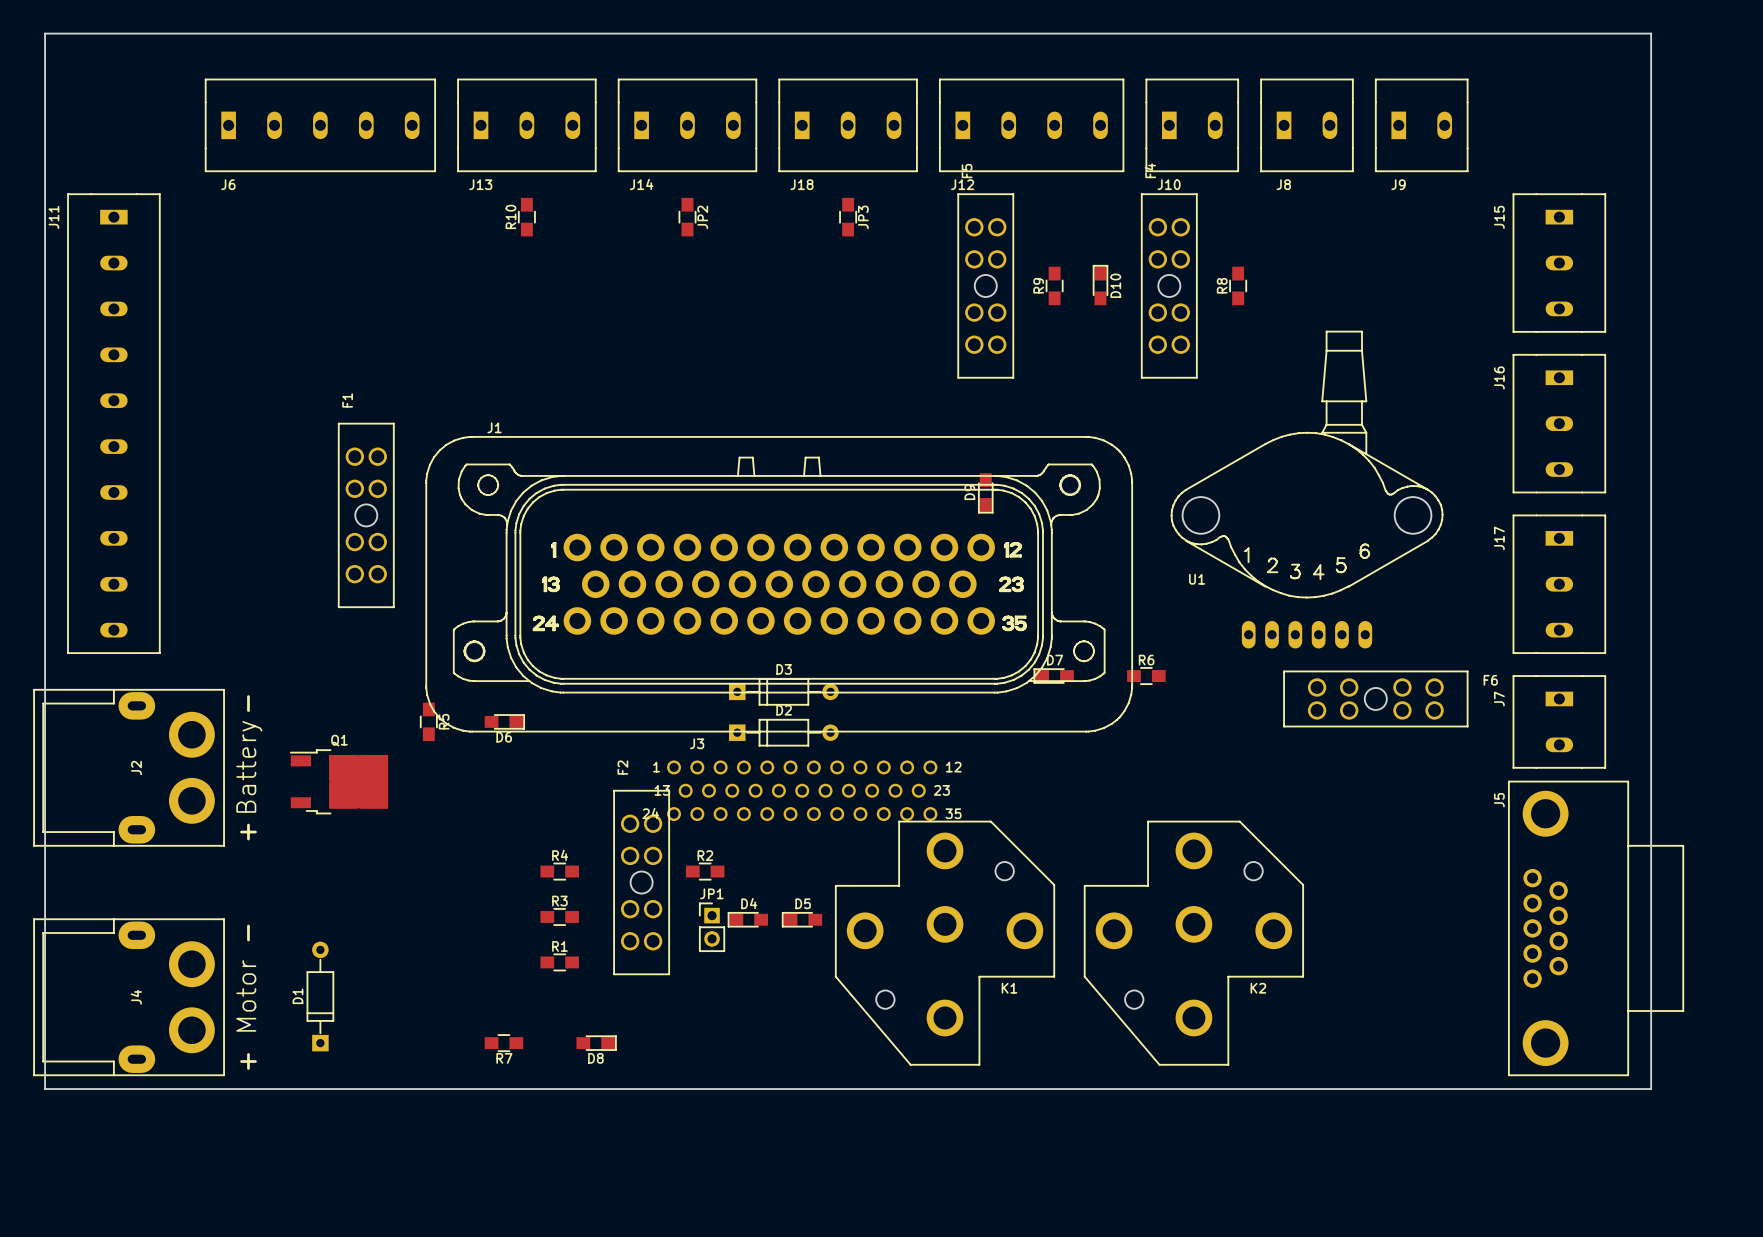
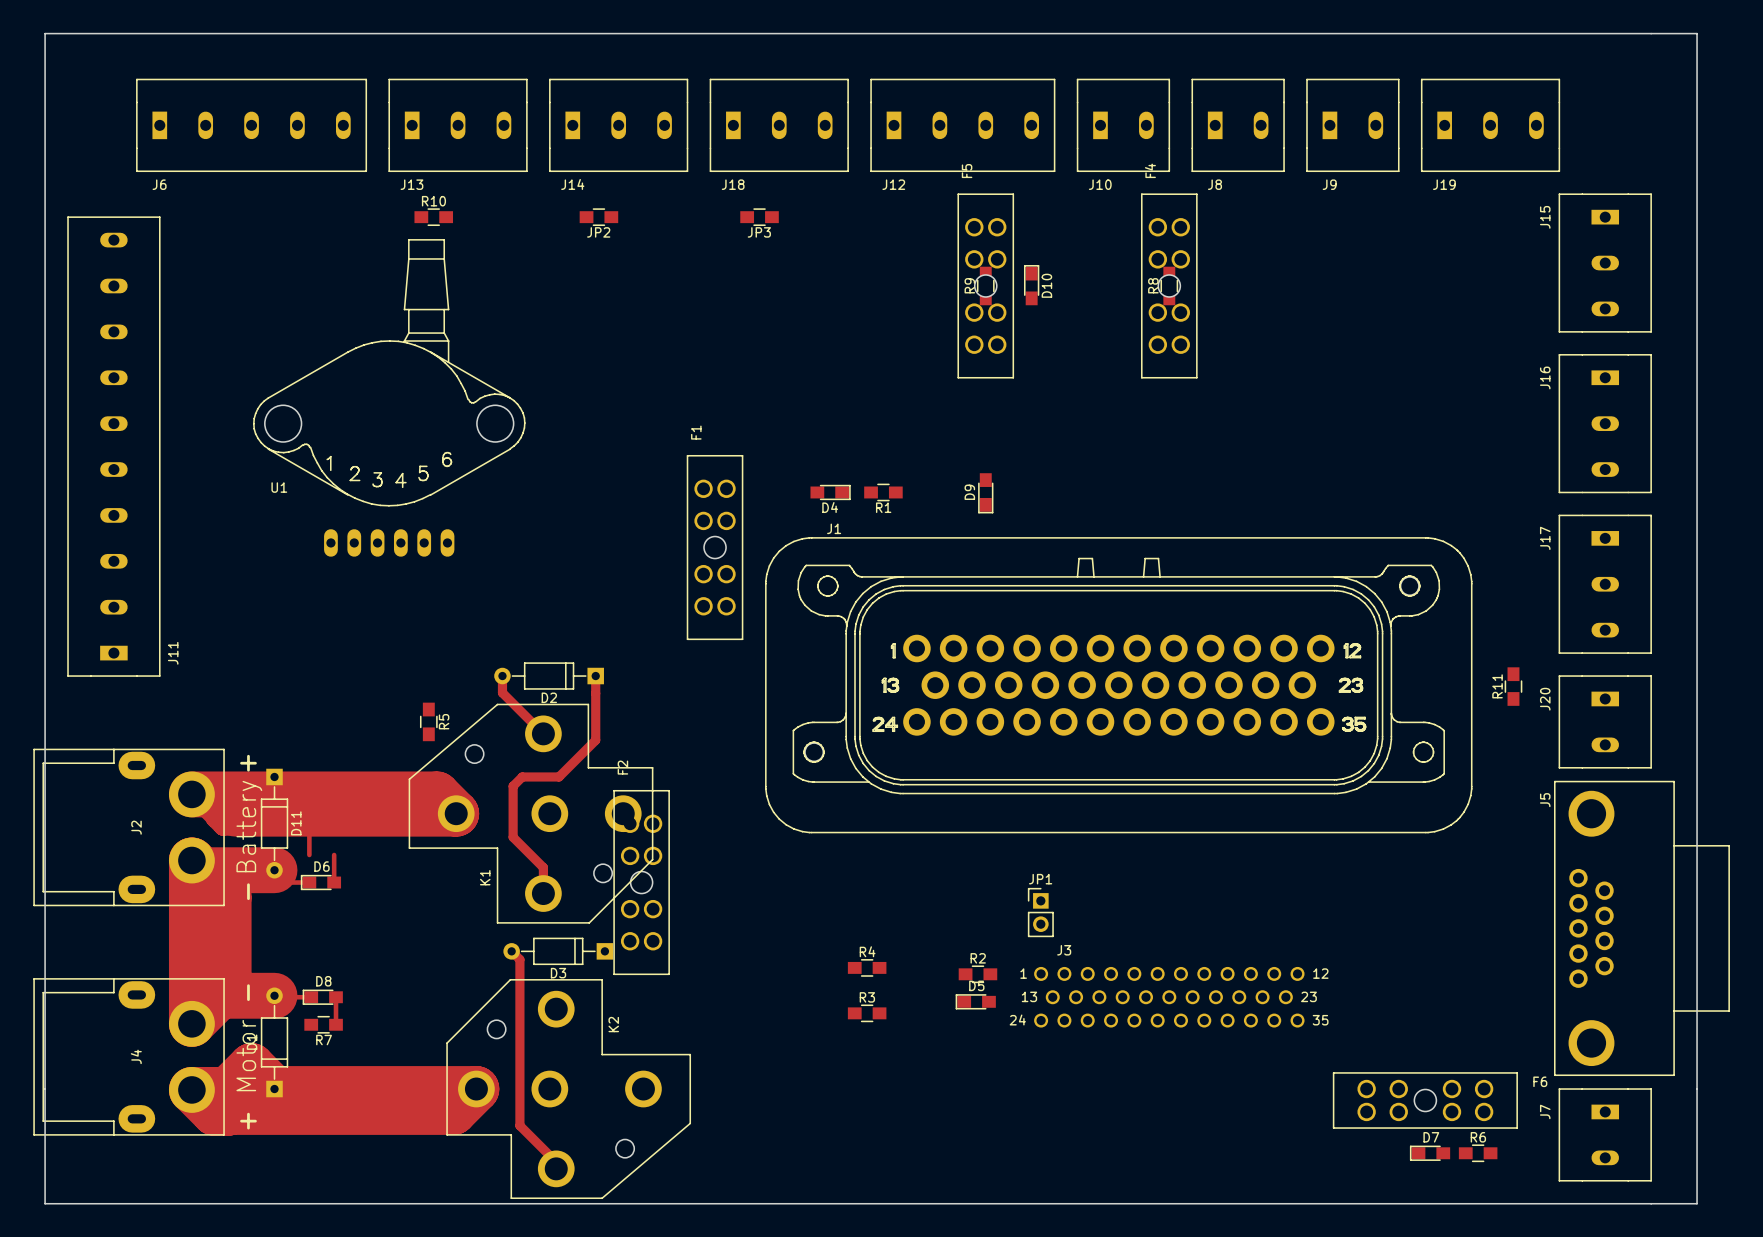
board edge: (1651, 33) (1651, 1089) (45, 1089) -> (1651, 33) (1697, 33) (1697, 1203) (45, 1203) (45, 1089)
J6 position: (320, 125) -> (251, 125)
J13 position: (526, 125) -> (458, 125)
J14 position: (687, 125) -> (618, 125)
J18 position: (848, 125) -> (779, 125)
J12 position: (1031, 125) -> (962, 125)
J10 position: (1192, 125) -> (1123, 125)
J8 position: (1306, 125) -> (1238, 125)
J9 position: (1421, 125) -> (1352, 125)
J19: none -> (1490, 125)
R10 rotation: 0° (526, 217) -> 90° clockwise (433, 217)
R10 position: (526, 217) -> (433, 217)
JP2 rotation: 0° (687, 217) -> 90° clockwise (598, 217)
JP2 position: (687, 217) -> (598, 217)
JP3 rotation: 0° (848, 217) -> 90° clockwise (759, 217)
JP3 position: (848, 217) -> (759, 217)
J15 position: (1559, 263) -> (1605, 263)
R9 position: (1054, 285) -> (985, 285)
D10 position: (1100, 285) -> (1031, 285)
R8 position: (1238, 285) -> (1169, 285)
J11 rotation: 0° (113, 423) -> 180° (113, 446)
J16 position: (1559, 423) -> (1605, 423)
U1 position: (1307, 489) -> (389, 398)
F1 position: (366, 515) -> (715, 547)
J1 position: (779, 584) -> (1118, 685)
J17 position: (1559, 584) -> (1605, 584)
track: none -> (502, 676) (502, 692) (543, 733)
track: none -> (595, 676) (595, 740) (559, 776) (522, 776) (513, 786) (513, 837) (543, 867) (543, 893)
D7 position: (1053, 676) -> (1430, 1153)
R6 position: (1146, 676) -> (1478, 1153)
R11: none -> (1513, 686)
D3 rotation: 0° (783, 691) -> 180° (558, 951)
D3 position: (783, 691) -> (558, 951)
F6 position: (1375, 698) -> (1425, 1100)
J2 text: - (248, 703) -> + (248, 763)
D6 rotation: 0° (504, 721) -> 180° (321, 882)
D6 position: (504, 721) -> (321, 882)
J7 position: (1559, 721) -> (1605, 1134)
J20: none -> (1605, 721)
D2 rotation: 0° (783, 732) -> 180° (549, 676)
D2 position: (783, 732) -> (549, 676)
J2 position: (129, 767) -> (129, 827)
Q1: (339, 781) -> none
J3 position: (802, 790) -> (1169, 997)
D11: none -> (274, 823)
track: none -> (223, 826) (191, 794) (436, 794) (456, 813) (235, 813) (223, 826)
track: none -> (310, 826) (309, 854)
J2 text: + (248, 832) -> - (248, 891)
track: none -> (334, 854) (334, 882)
track: none -> (201, 870) (274, 870) (286, 882) (309, 882)
R4 position: (559, 871) -> (867, 967)
R2 position: (705, 871) -> (977, 974)
R3 position: (559, 916) -> (867, 1013)
D4 rotation: 0° (748, 919) -> 180° (830, 492)
D4 position: (748, 919) -> (830, 492)
D5 position: (802, 919) -> (975, 1001)
JP1 position: (712, 927) -> (1040, 912)
J5 position: (1596, 928) -> (1641, 928)
K1 rotation: 0° (945, 943) -> 90° clockwise (531, 813)
K1 position: (945, 943) -> (531, 813)
K2 rotation: 0° (1193, 943) -> 90° counterclockwise (568, 1089)
K2 position: (1193, 943) -> (568, 1089)
R1 name position: R1 (559, 946) -> R1 (883, 507)
track: none -> (511, 951) (519, 959) (519, 1125) (556, 1162) (556, 1168)
R1 position: (559, 962) -> (883, 492)
track: none -> (228, 987) (228, 897) (191, 860) (191, 1023) (228, 987)
track: none -> (219, 995) (311, 997)
D1 position: (320, 996) -> (274, 1042)
J4 position: (129, 997) -> (129, 1056)
track: none -> (336, 997) (336, 1024)
R7 position: (503, 1043) -> (323, 1024)
D8 rotation: 0° (596, 1043) -> 180° (322, 997)
D8 position: (596, 1043) -> (322, 997)
track: none -> (251, 1066) (227, 1089) (191, 1089) (214, 1112) (227, 1112) (453, 1111) (476, 1089) (274, 1089) (251, 1066)

